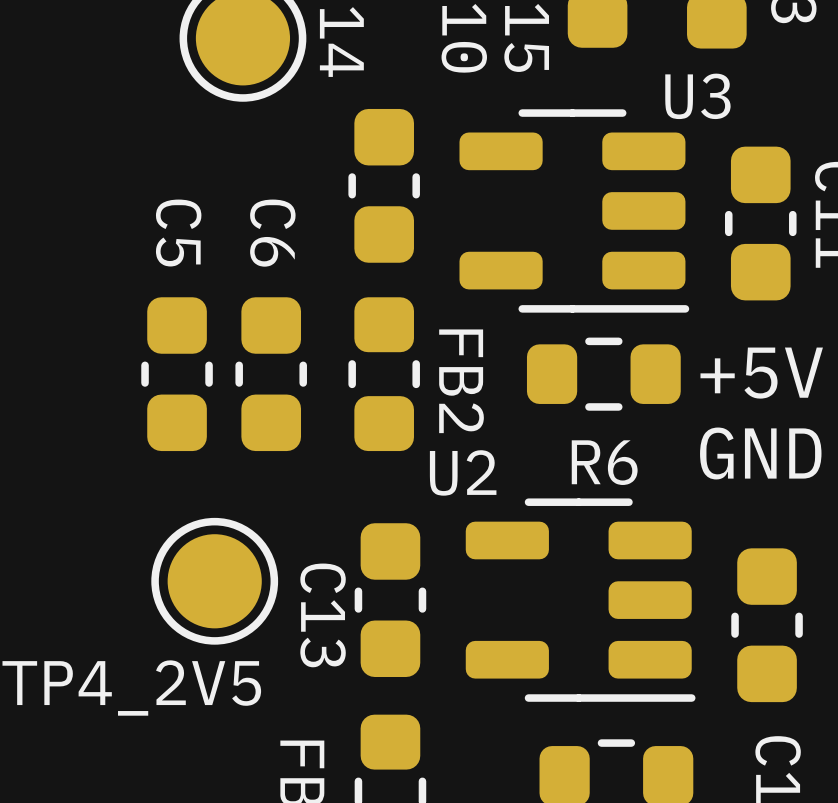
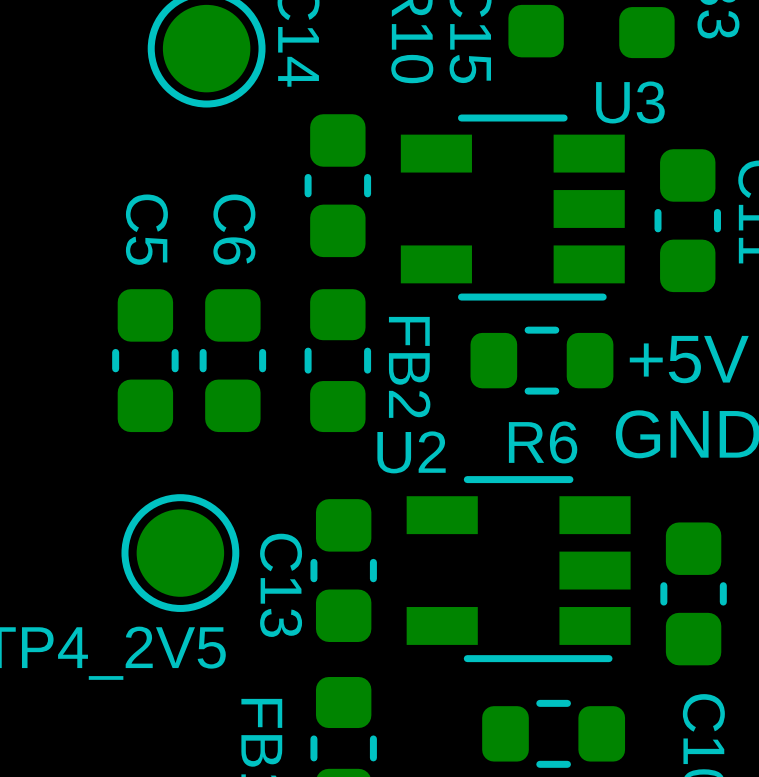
U3 footprint: [459, 109, 690, 313] -> [400, 114, 625, 301]
U2 footprint: [465, 498, 696, 702] -> [406, 476, 631, 663]

